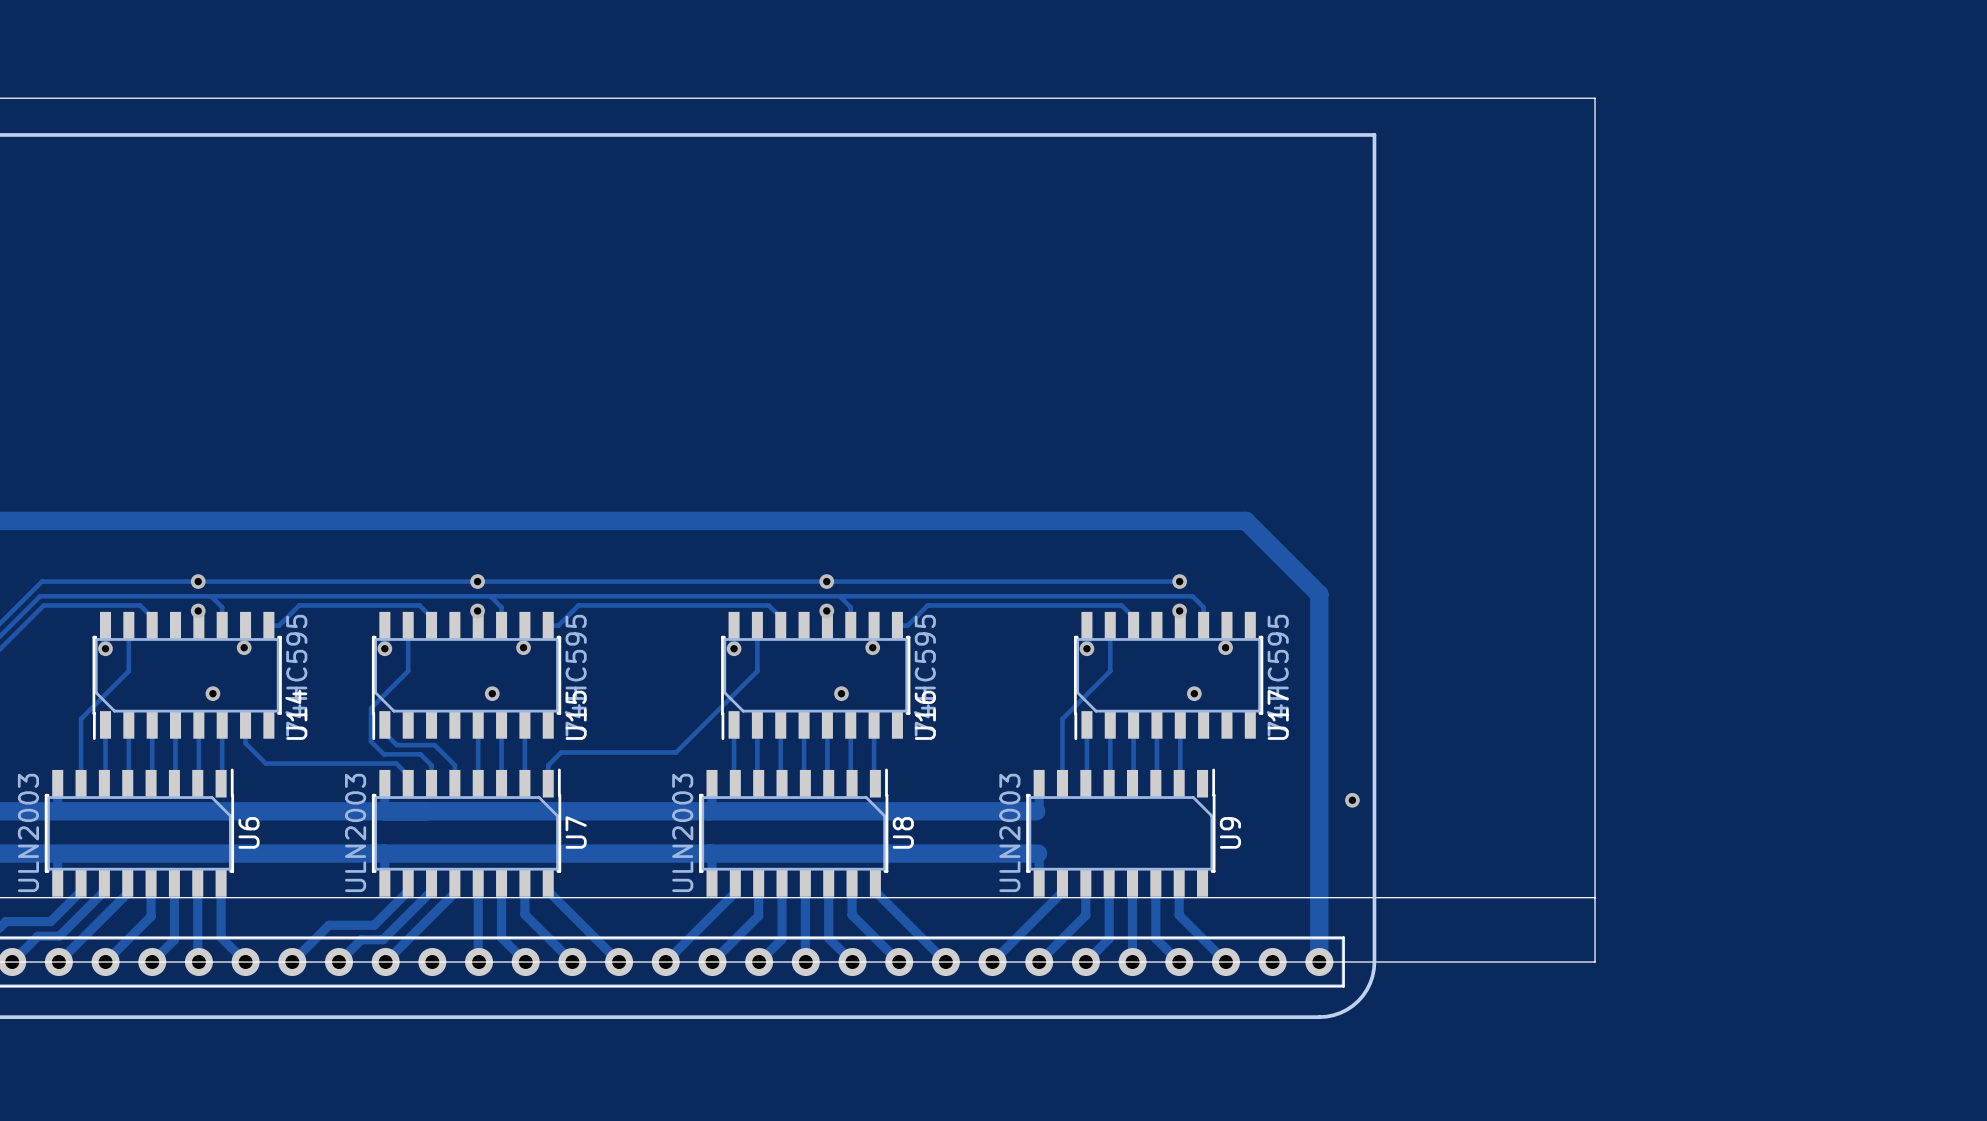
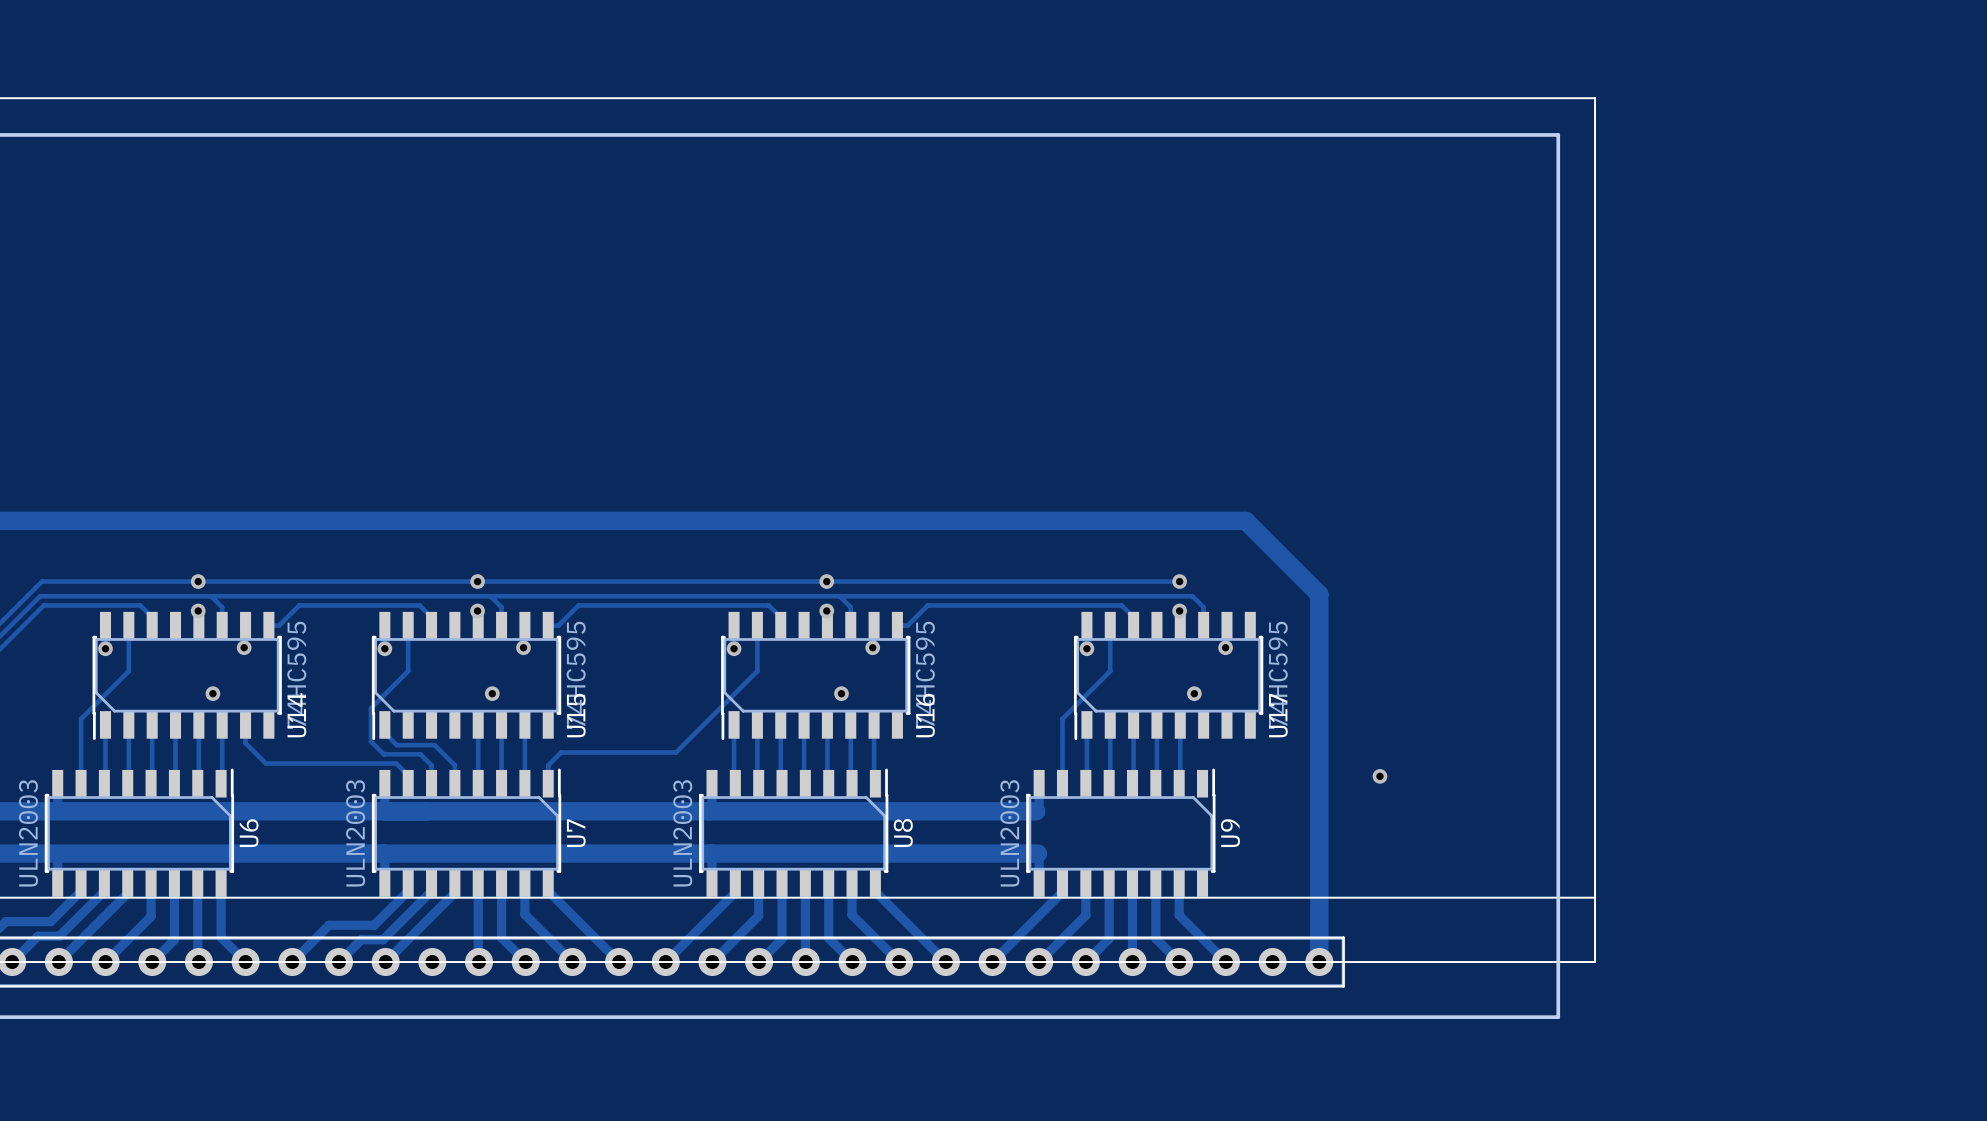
board edge: (1374, 134) (1374, 962) (1370, 983) (1358, 1000) (1340, 1012) (1319, 1017) -> (1374, 134) (1558, 134) (1558, 1017) (1319, 1017)
via position: (1352, 800) -> (1379, 776)

